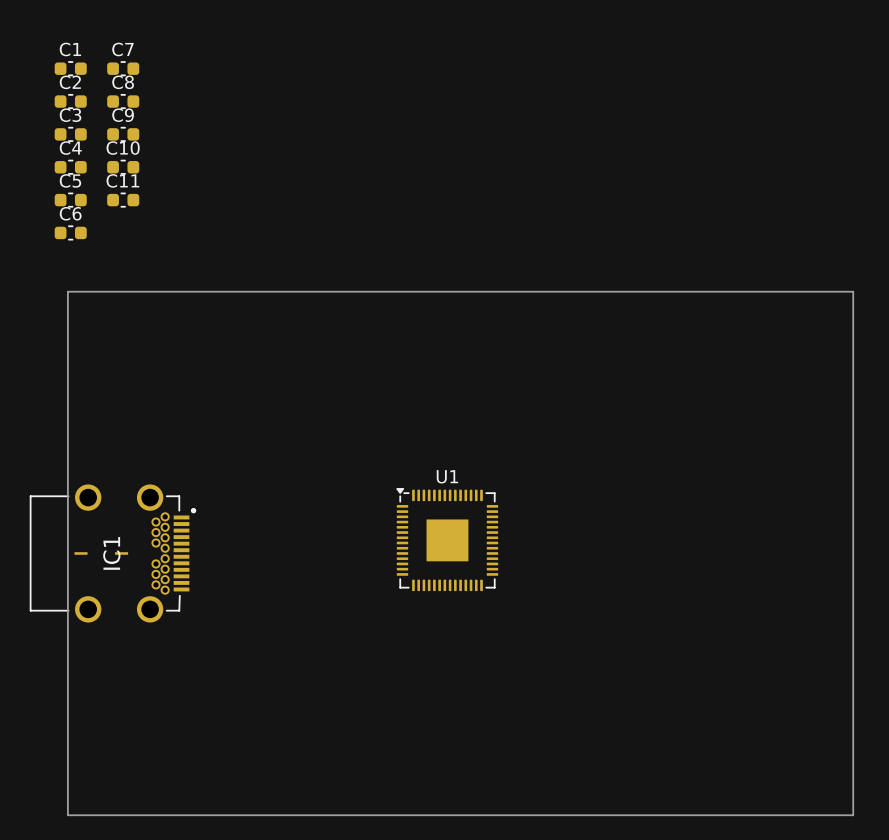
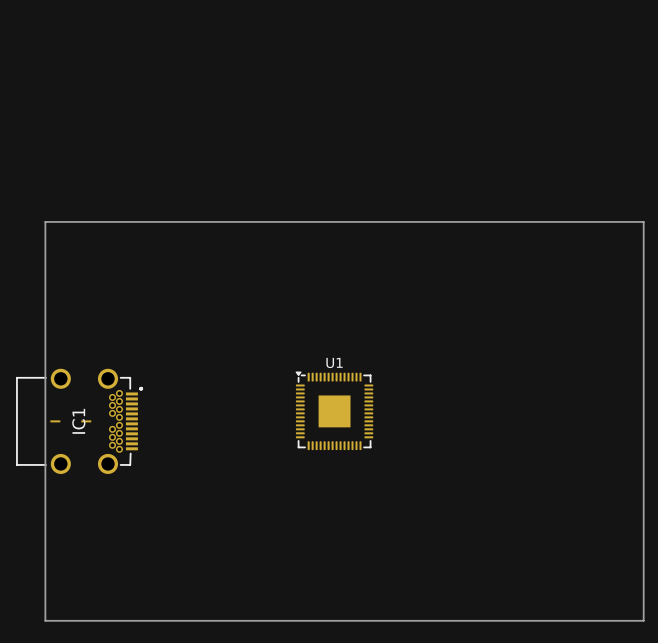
C1: (70, 68) -> none
C7: (123, 68) -> none
C2: (70, 101) -> none
C8: (123, 101) -> none
C3: (70, 134) -> none
C9: (123, 134) -> none
C4: (70, 167) -> none
C10: (123, 167) -> none
C5: (70, 200) -> none
C11: (123, 200) -> none
C6: (70, 232) -> none

